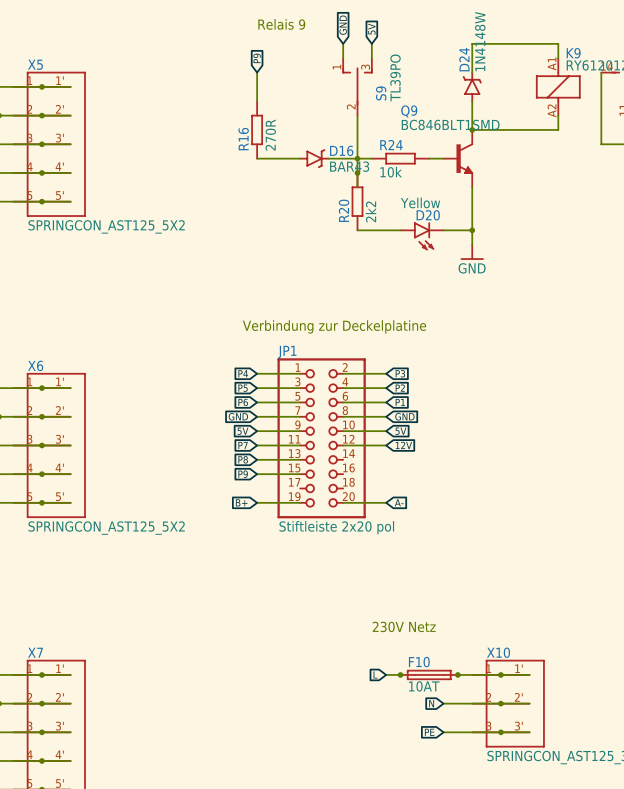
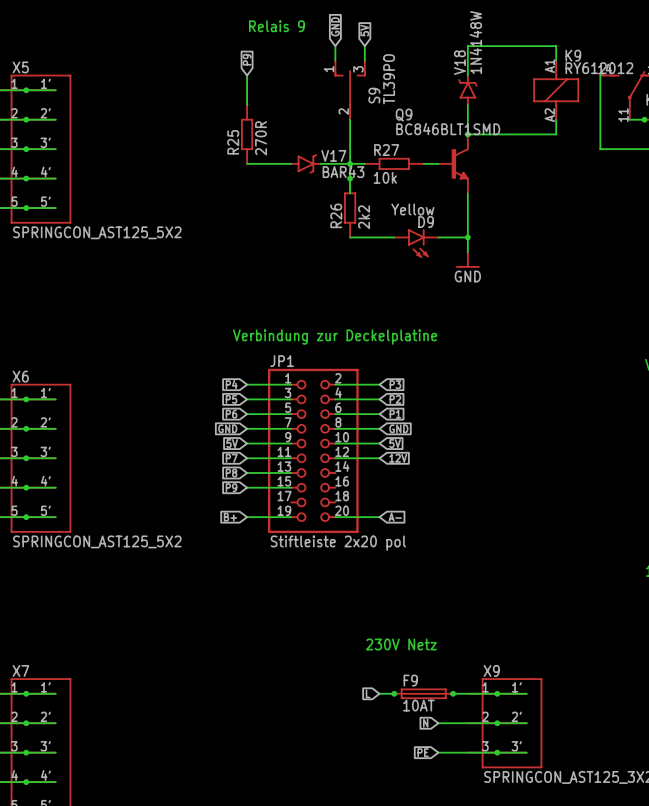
D24 name: D24 (464, 59) -> V18 (459, 62)
R16 name: R16 (243, 139) -> R25 (233, 142)
R24 name: R24 (391, 145) -> R27 (386, 150)
D16 name: D16 (341, 150) -> V17 (333, 155)
R20 name: R20 (344, 210) -> R26 (336, 215)
D20 name: D20 (428, 215) -> D9 (426, 222)
X10 name: X10 (498, 652) -> X9 (491, 670)
F10 name: F10 (419, 662) -> F9 (410, 680)

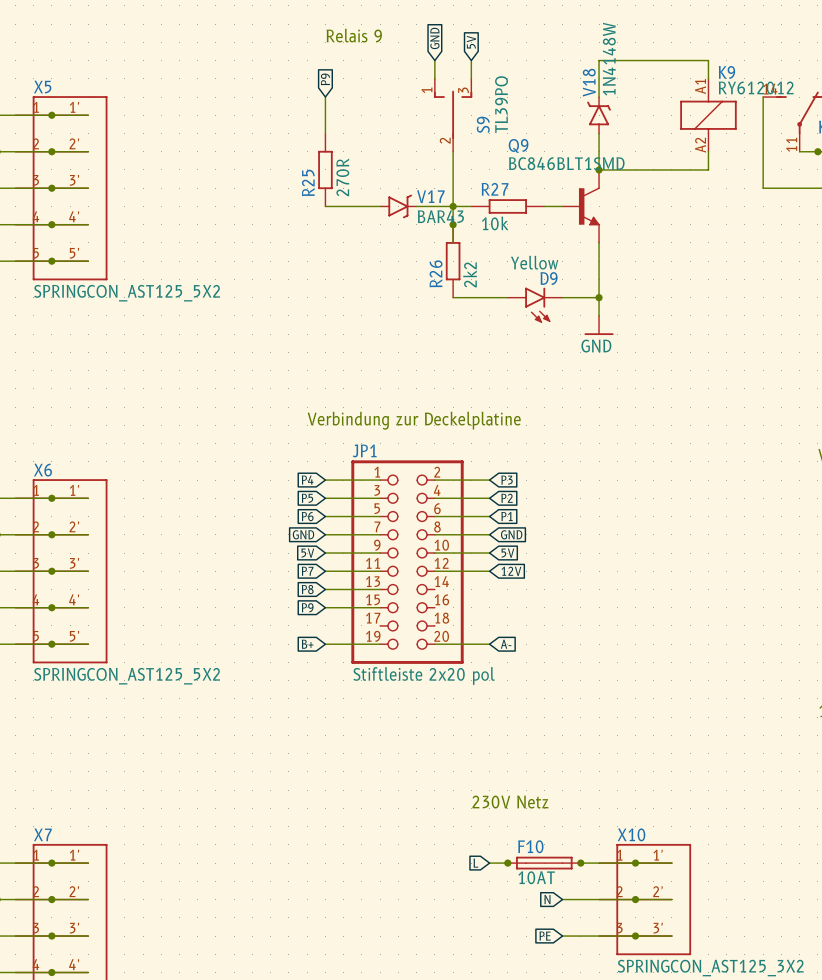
X9 name: X9 (491, 670) -> X10 (631, 834)
F9 name: F9 (410, 680) -> F10 (530, 846)

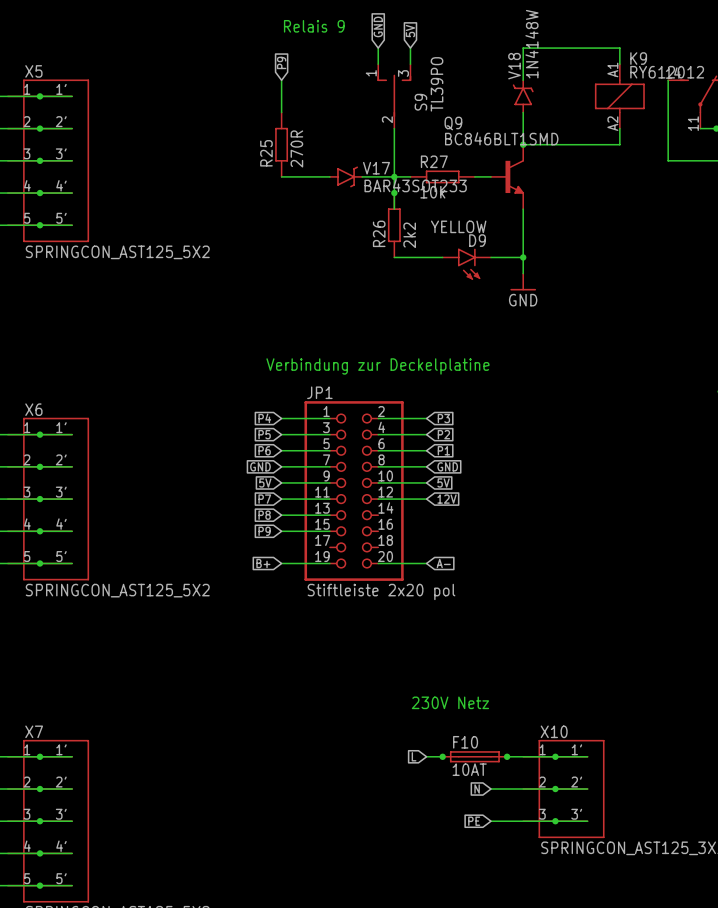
V17 value: BAR43 (440, 216) -> BAR43SOT233 (415, 185)
D9 value: Yellow (534, 262) -> YELLOW (458, 226)

